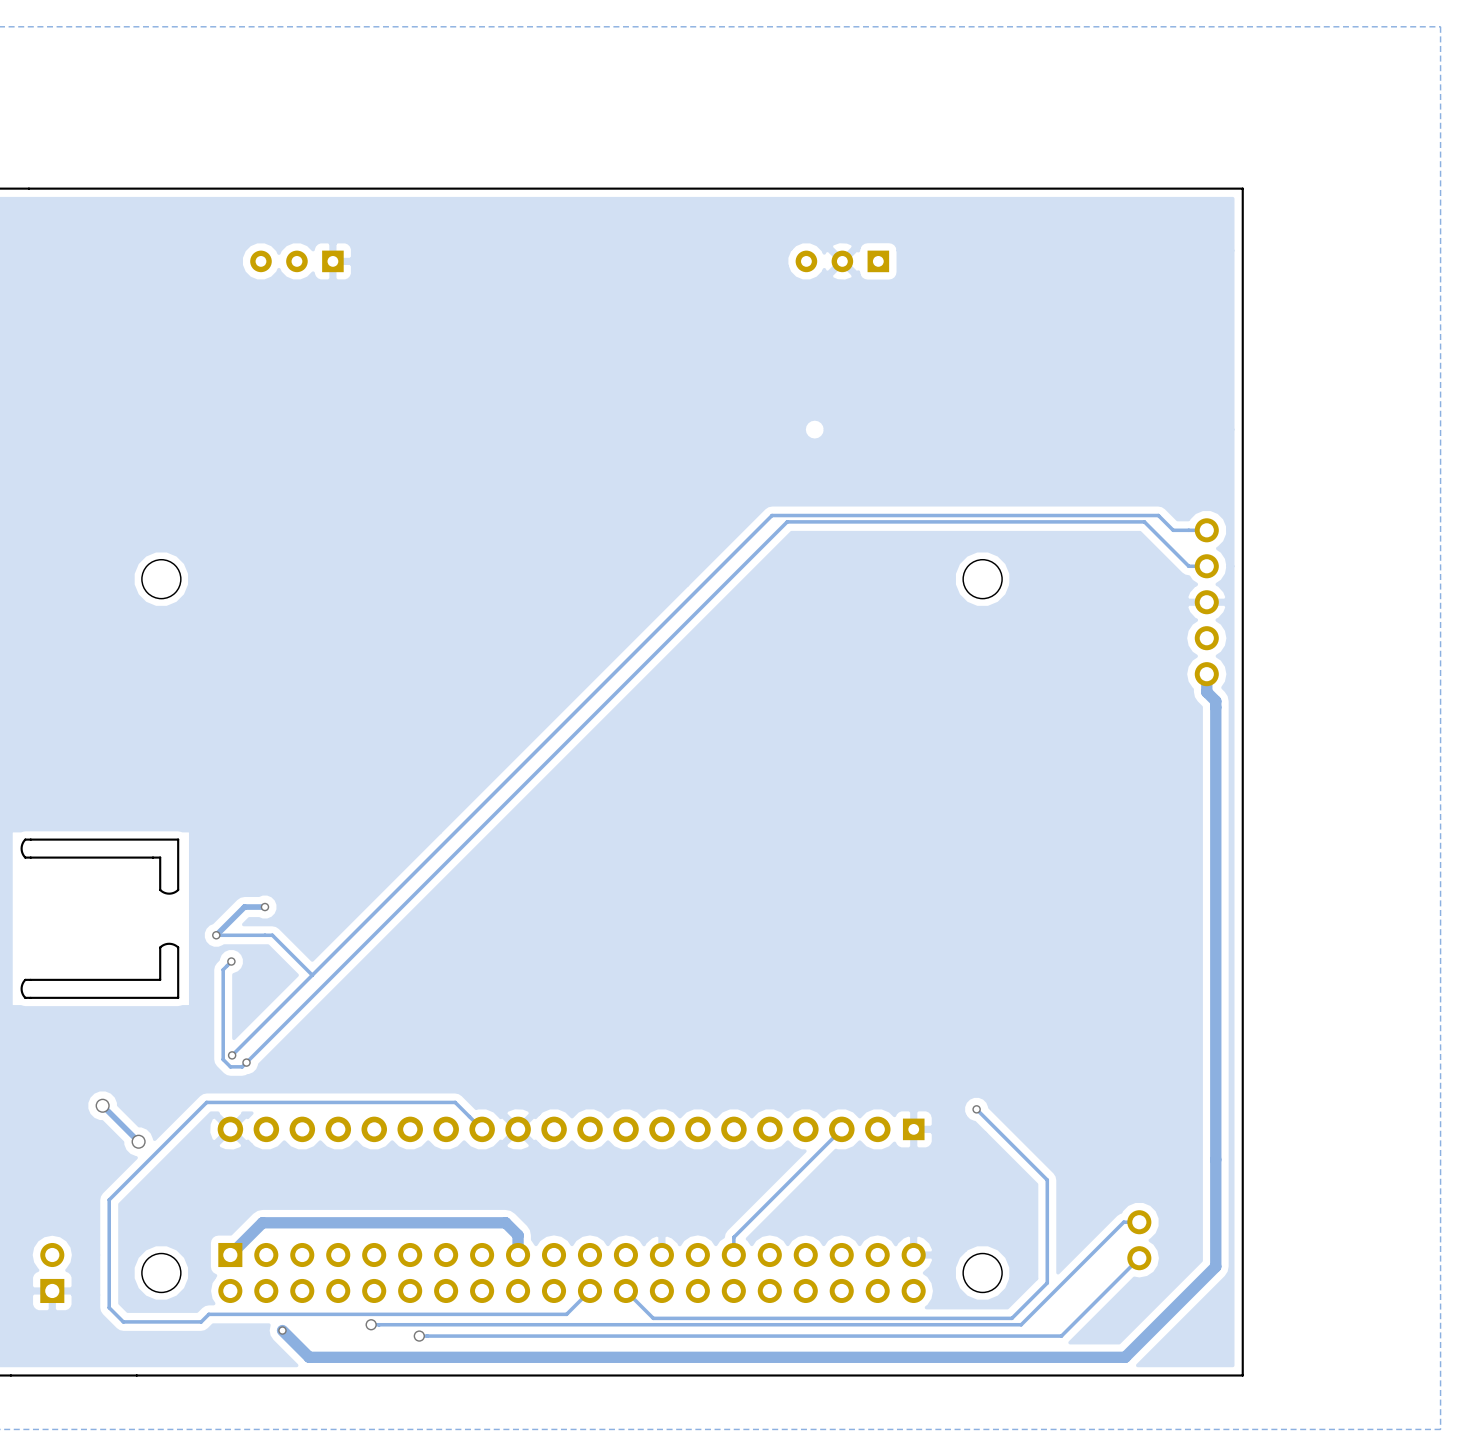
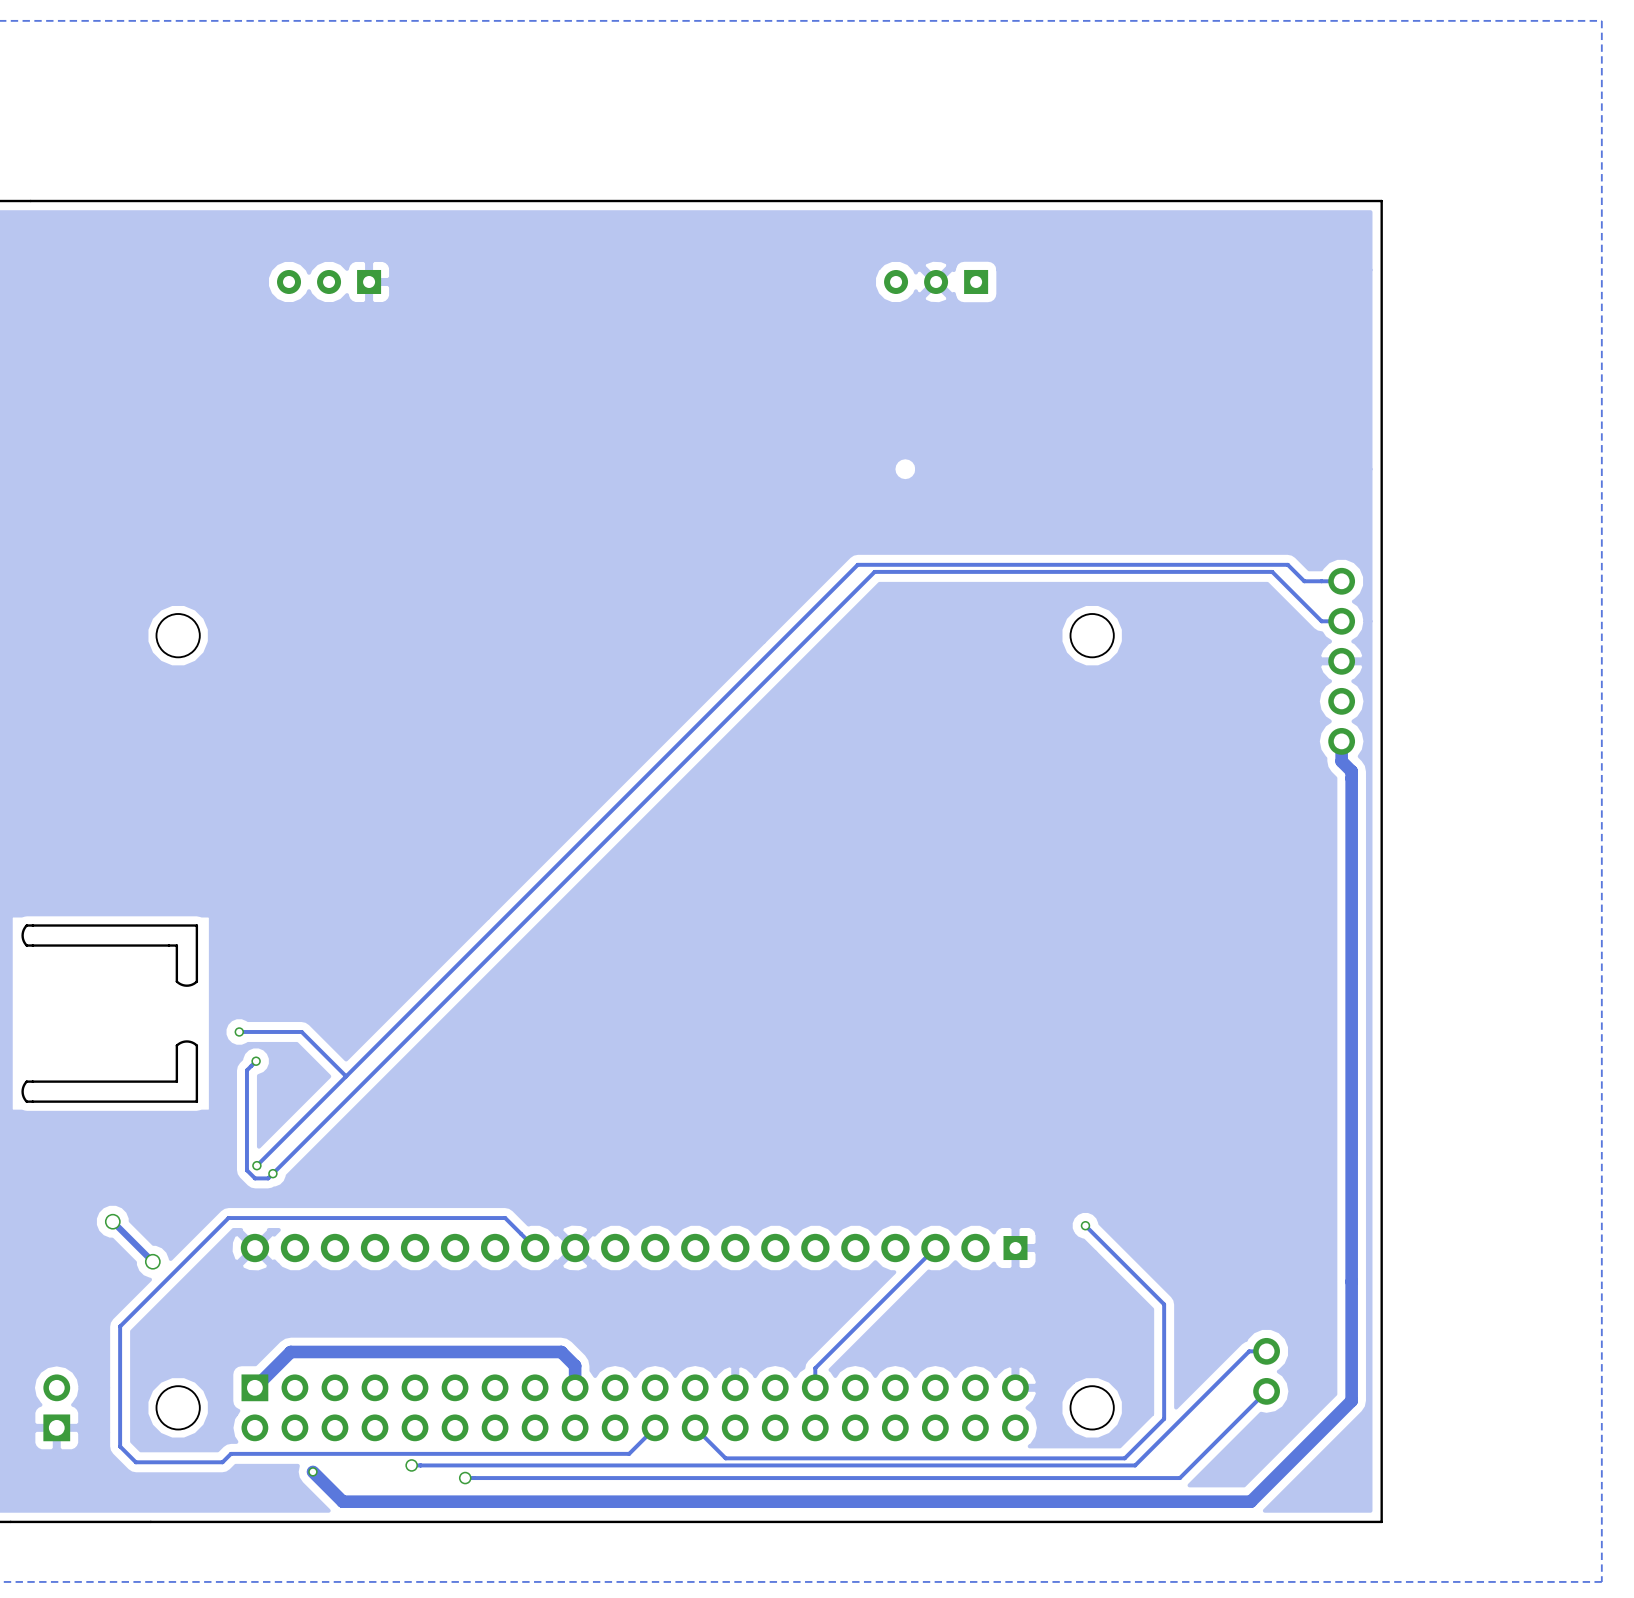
track: (264, 907) (244, 907) (216, 935) -> none
via: (264, 907) -> none

